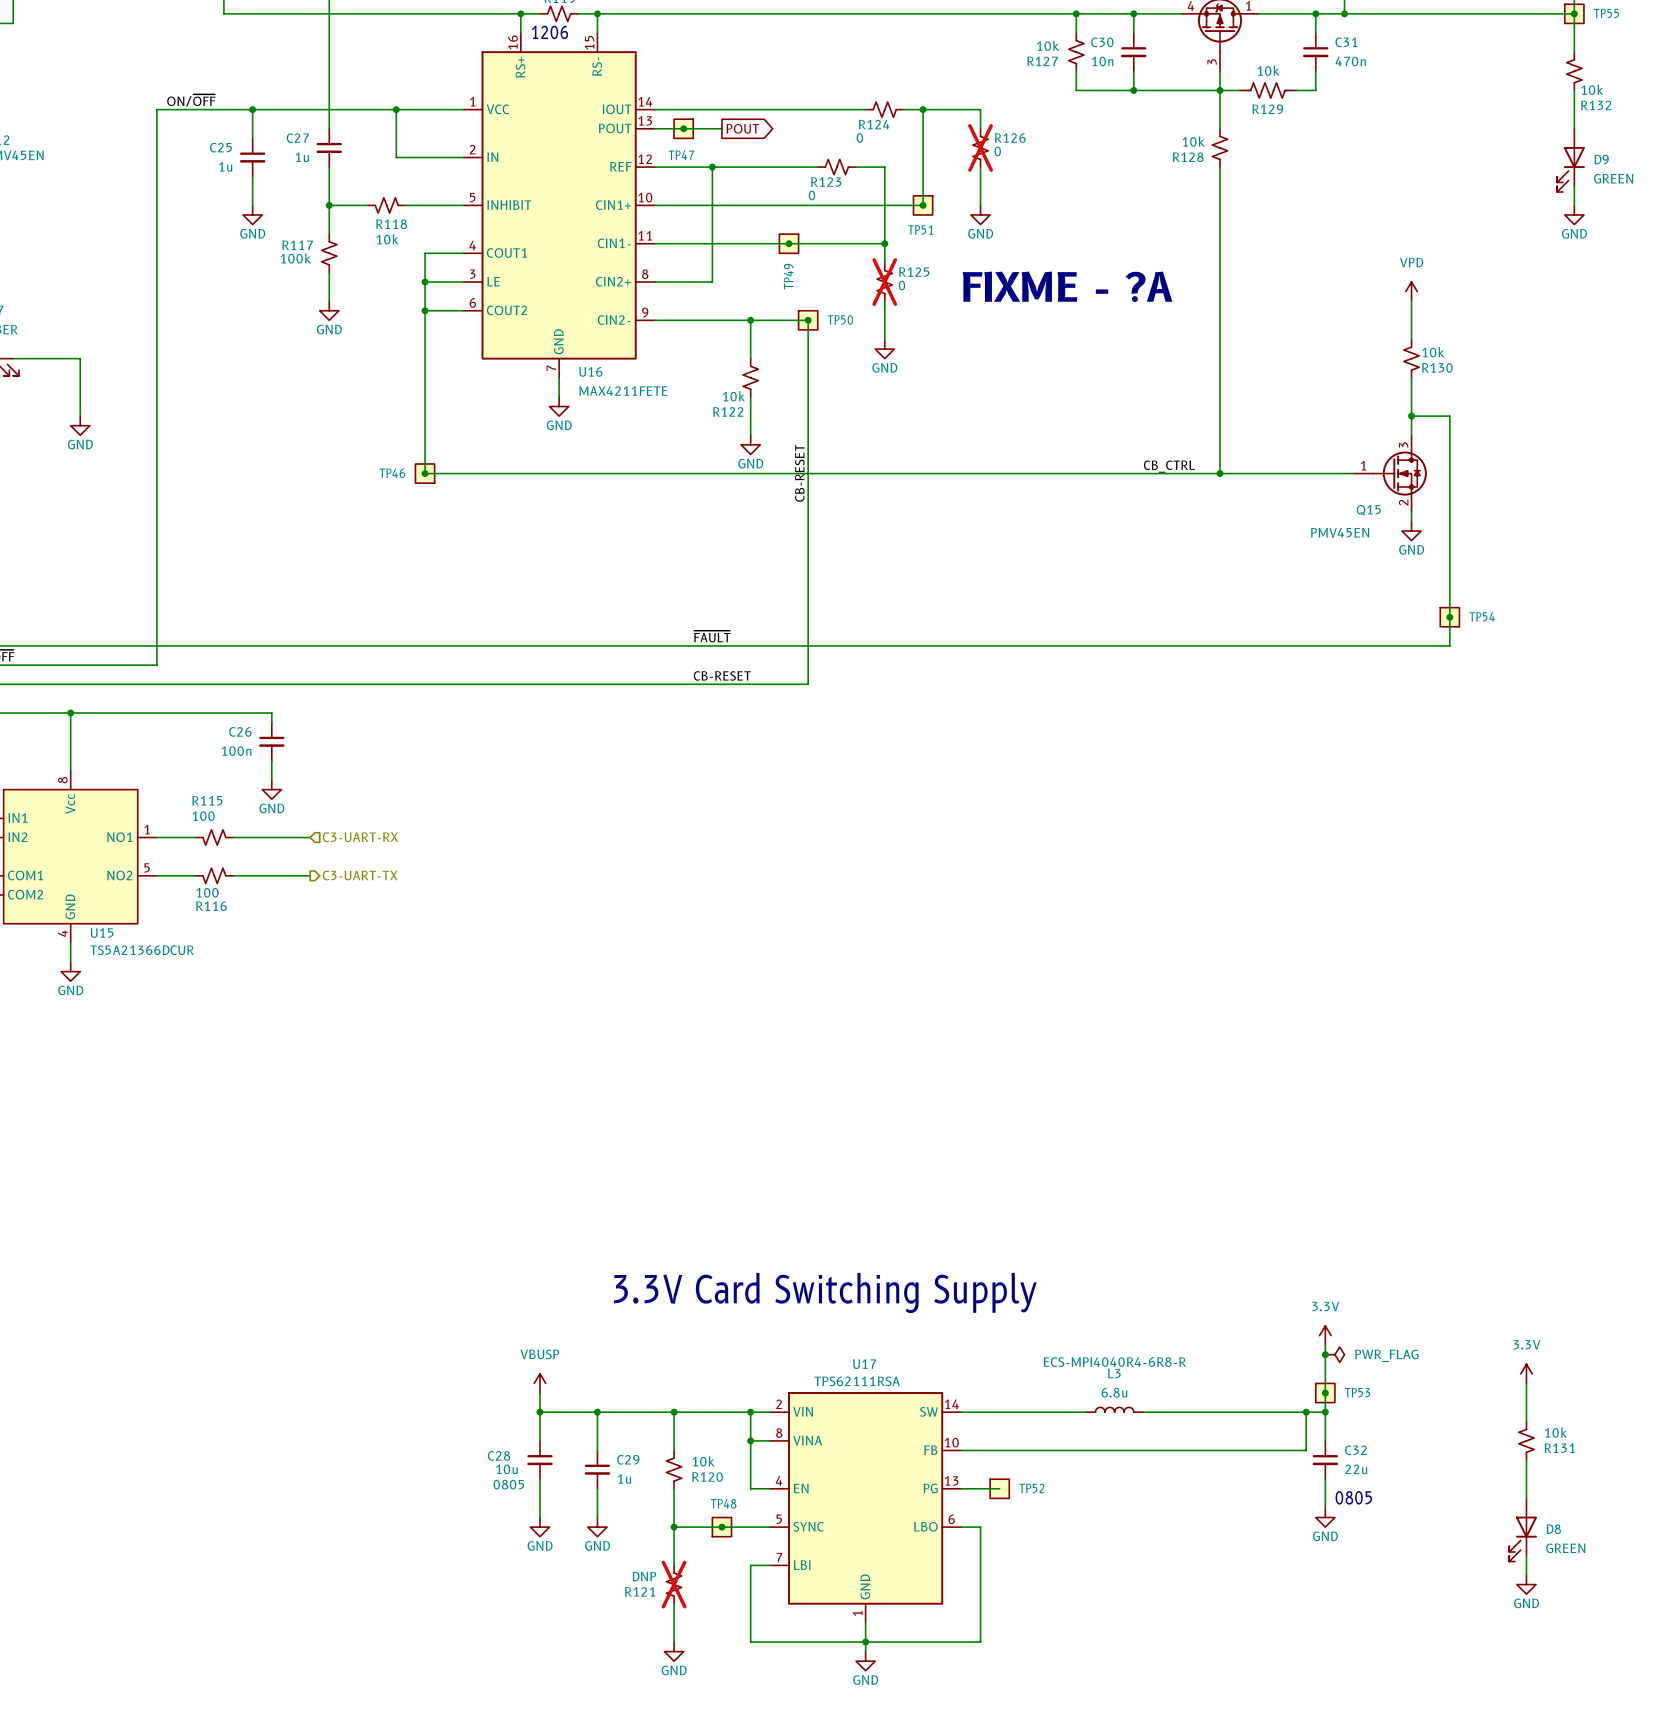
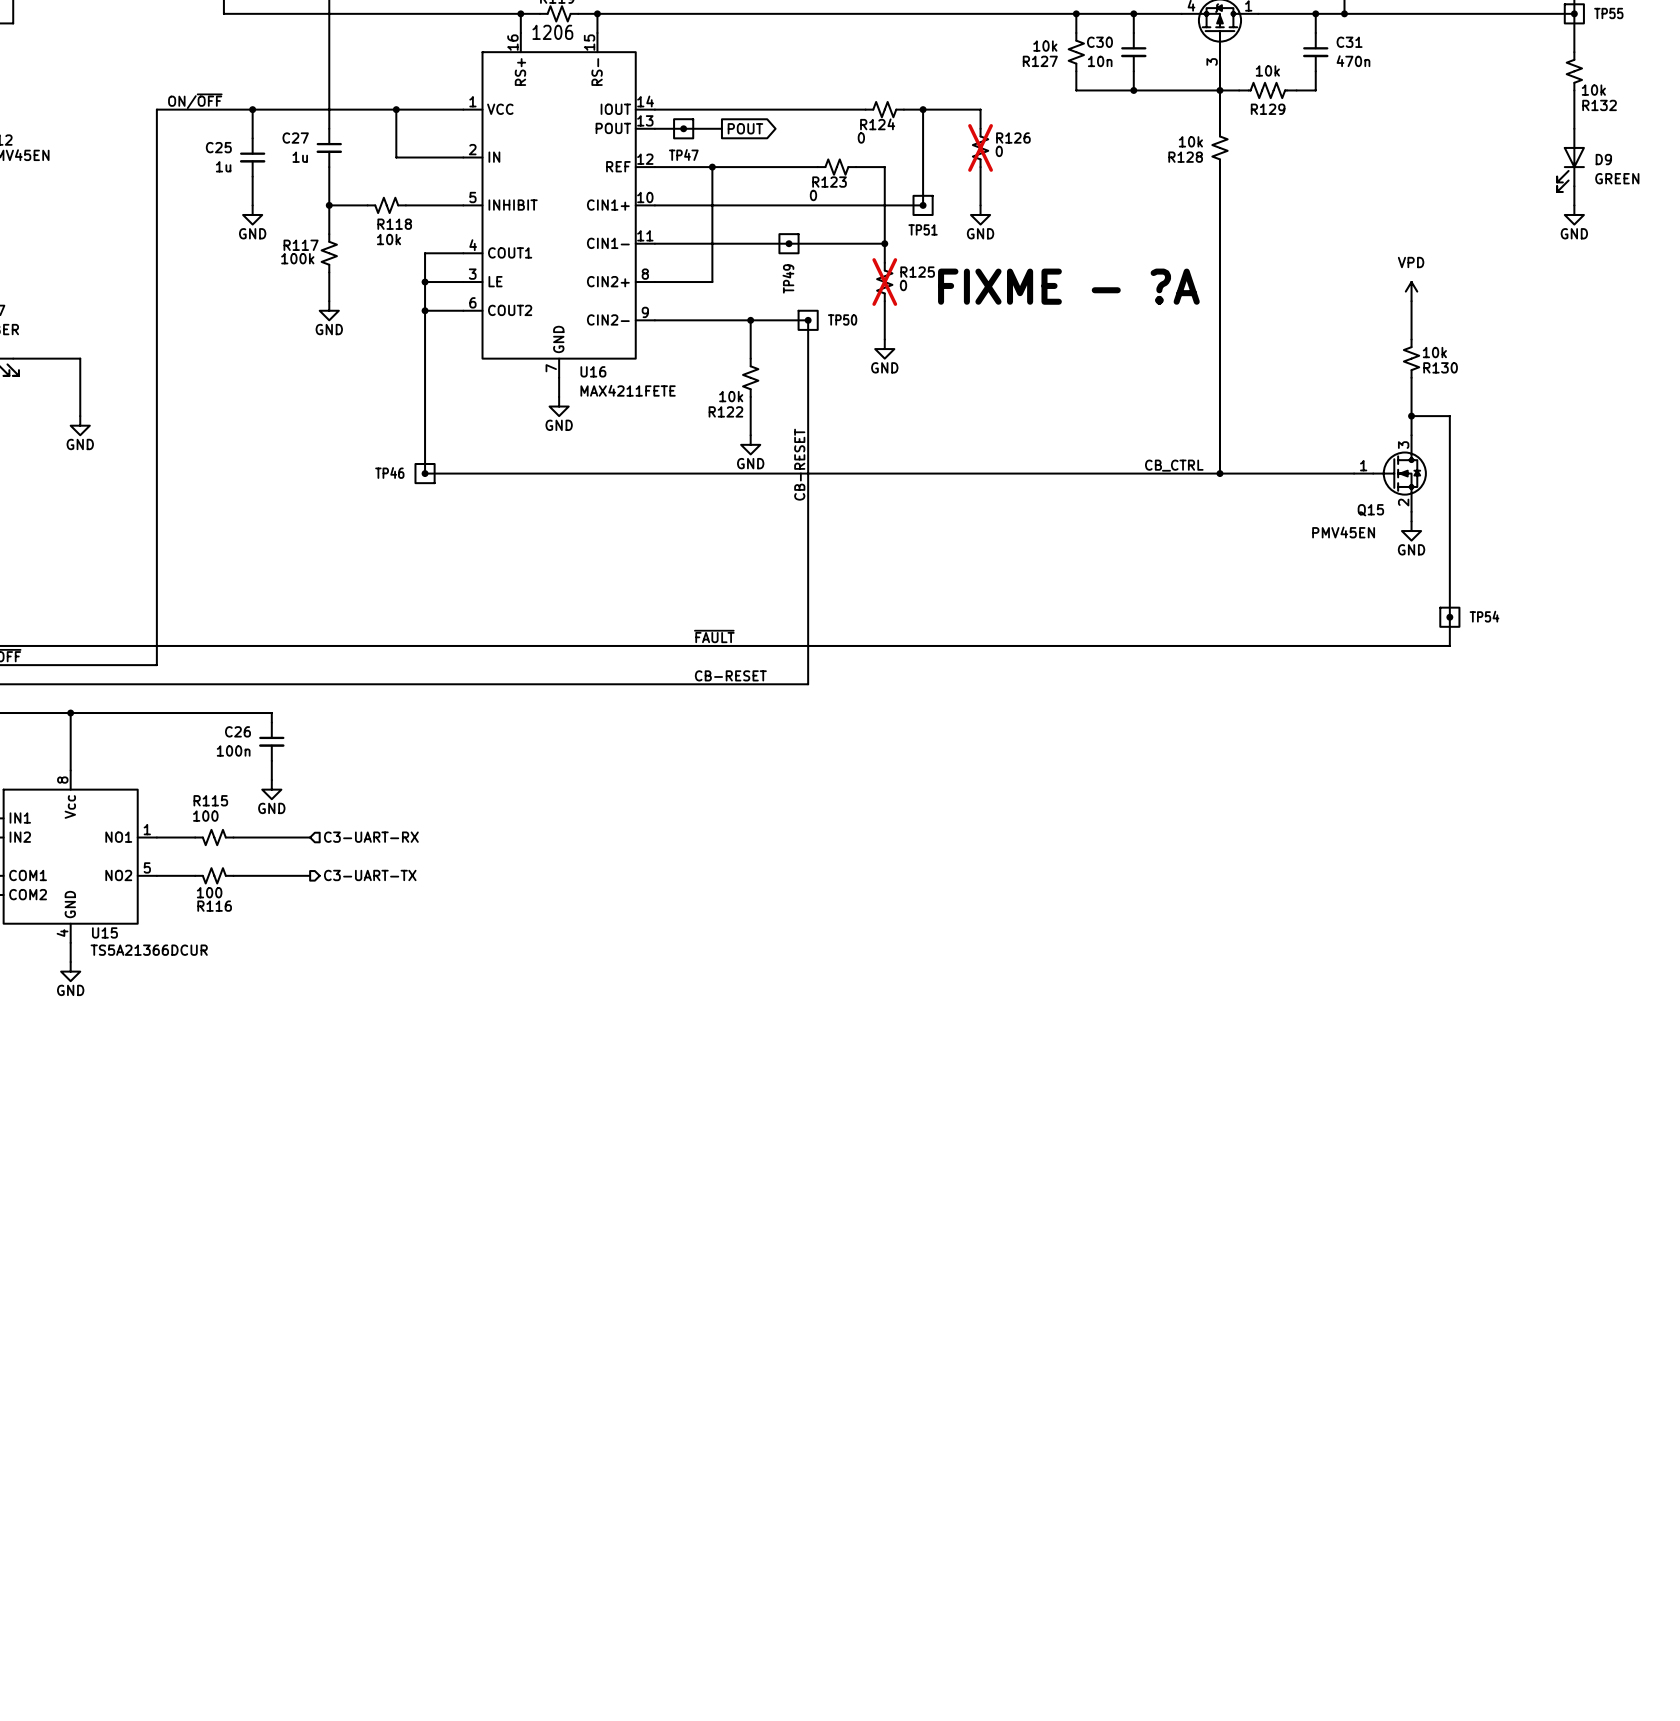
text: 3.3V Card Switching Supply (825, 1292) -> none
power symbol: 3.3V (1325, 1335) -> none
wire: (1325, 1345) (1325, 1440) -> none
junction: (1325, 1354) -> none
power symbol: PWR_FLAG (1334, 1354) -> none
power symbol: 3.3V (1526, 1373) -> none
power symbol: VBUSP (539, 1383) -> none
wire: (1526, 1383) (1526, 1421) -> none
wire: (539, 1393) (539, 1440) -> none
junction: (1325, 1393) -> none
TP53: (1325, 1393) -> none
L3: 6.8u (1114, 1409) -> none
wire: (539, 1412) (769, 1412) -> none
junction: (539, 1412) -> none
wire: (597, 1412) (597, 1450) -> none
junction: (597, 1412) -> none
wire: (674, 1412) (674, 1450) -> none
junction: (674, 1412) -> none
wire: (750, 1412) (750, 1488) (769, 1488) -> none
junction: (750, 1412) -> none
wire: (961, 1412) (1085, 1412) -> none
wire: (1143, 1412) (1325, 1412) -> none
wire: (1306, 1412) (1306, 1450) (961, 1450) -> none
junction: (1306, 1412) -> none
junction: (1325, 1412) -> none
wire: (750, 1440) (769, 1440) -> none
junction: (750, 1440) -> none
R131: 10k (1526, 1440) -> none
C28: 10u (539, 1460) -> none
C32: 22u (1325, 1460) -> none
wire: (1526, 1460) (1526, 1498) -> none
C29: 1u (597, 1469) -> none
R120: 10k (674, 1469) -> none
wire: (539, 1479) (539, 1517) -> none
wire: (1325, 1479) (1325, 1507) -> none
wire: (597, 1488) (597, 1517) -> none
wire: (674, 1488) (674, 1565) -> none
wire: (961, 1488) (999, 1488) -> none
TP52: (999, 1488) -> none
text: 0805 (1353, 1497) -> none
U17: TPS62111RSA (865, 1507) -> none
power symbol: GND (1325, 1517) -> none
power symbol: GND (539, 1527) -> none
power symbol: GND (597, 1527) -> none
wire: (674, 1527) (769, 1527) -> none
junction: (674, 1527) -> none
junction: (721, 1527) -> none
TP48: (721, 1527) -> none
wire: (961, 1527) (980, 1527) (980, 1642) (750, 1642) (750, 1565) (769, 1565) -> none
D8: GREEN (1523, 1529) -> none
wire: (1526, 1555) (1526, 1574) -> none
R121: DNP (674, 1584) -> none
power symbol: GND (1526, 1584) -> none
wire: (674, 1603) (674, 1642) -> none
wire: (865, 1622) (865, 1651) -> none
junction: (865, 1642) -> none
power symbol: GND (674, 1651) -> none
power symbol: GND (865, 1661) -> none

